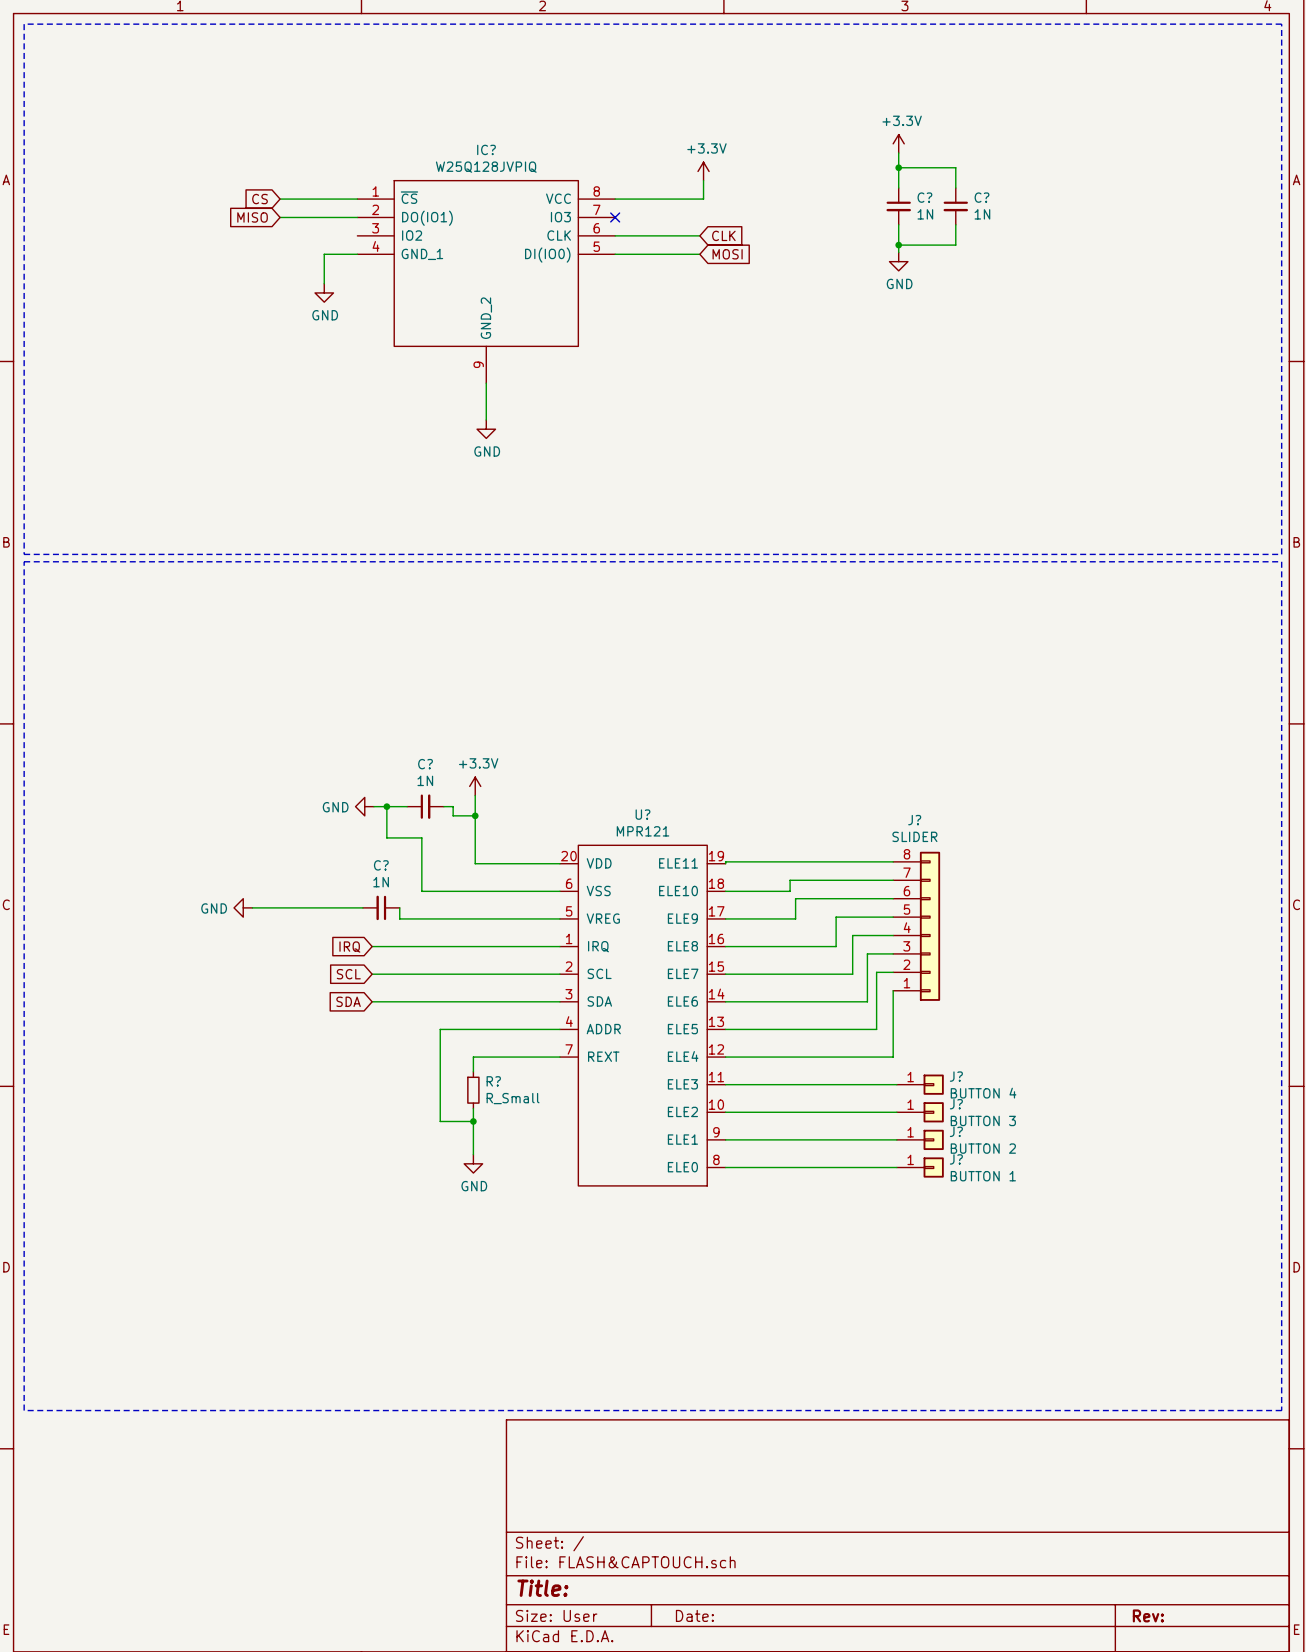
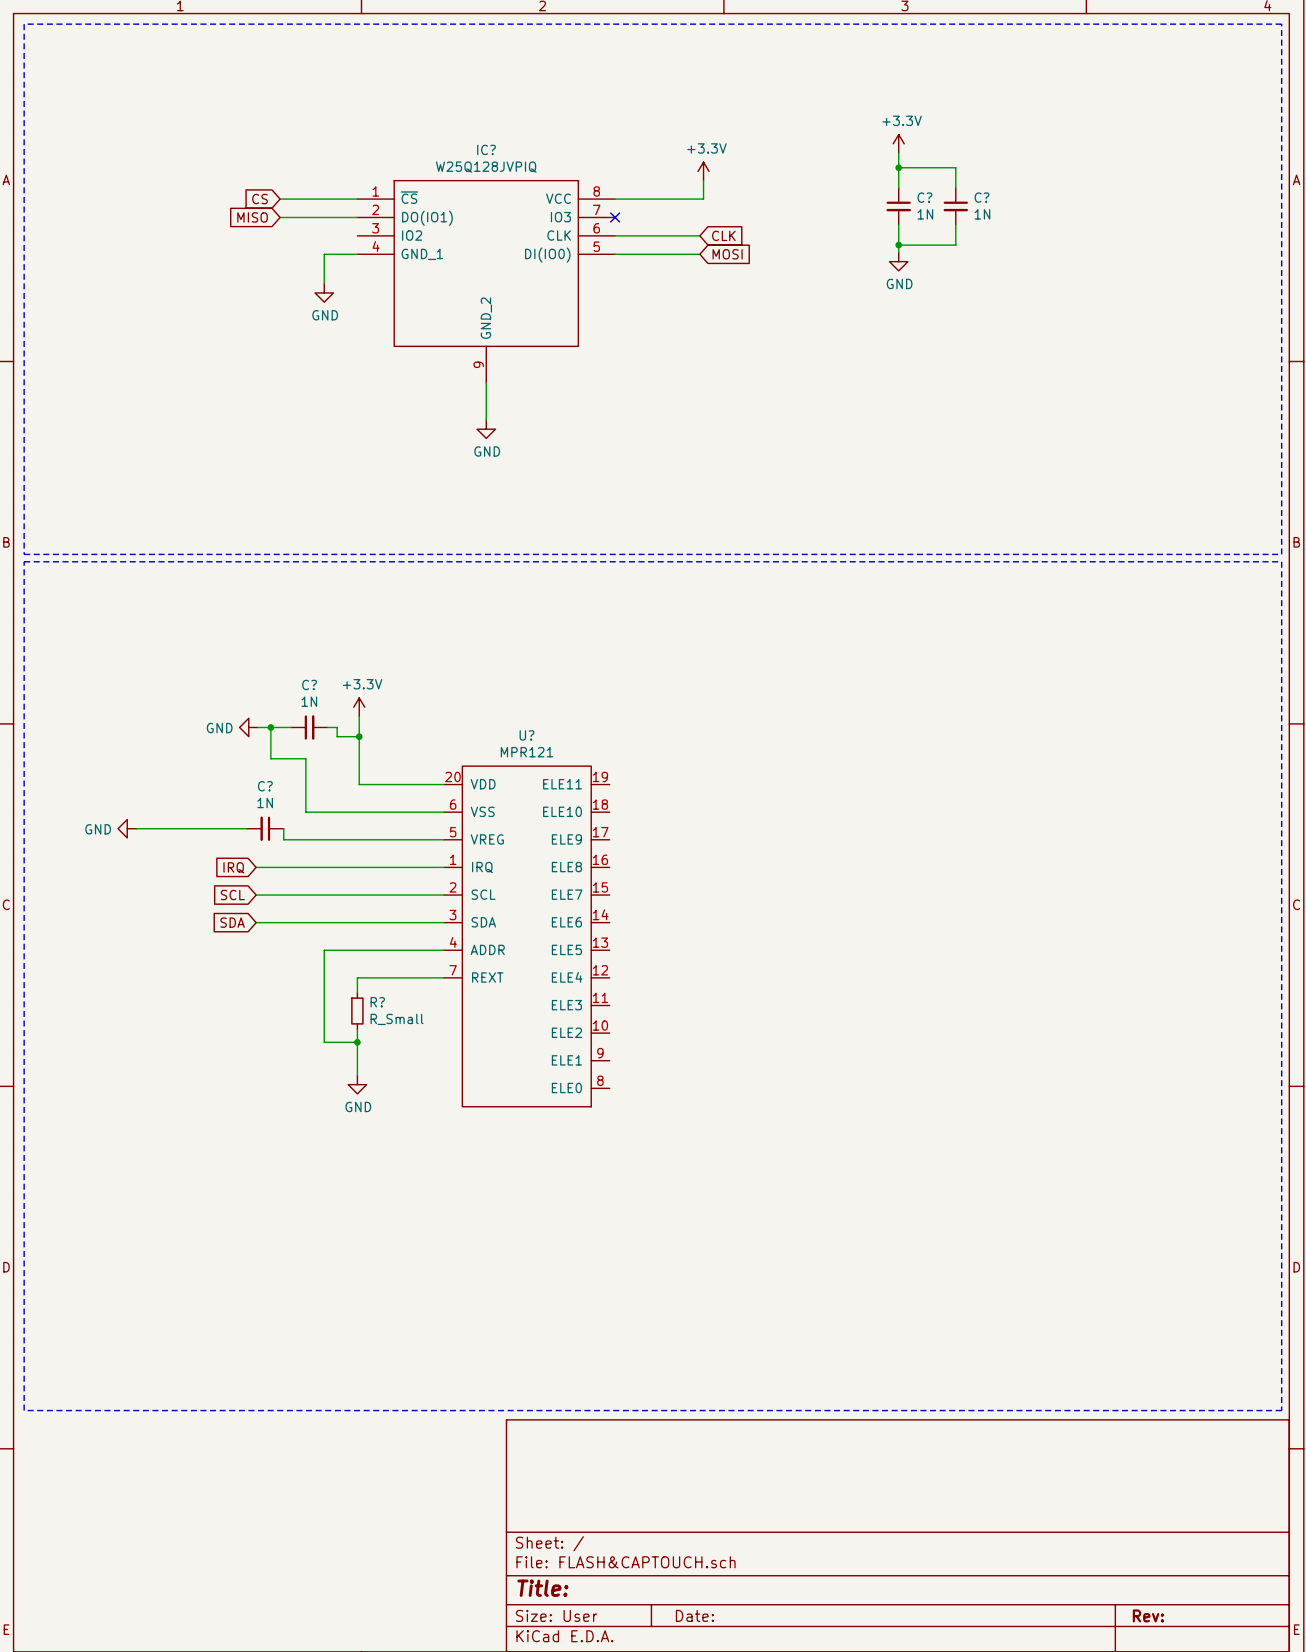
power symbol: none -> GND (248, 727)
junction: none -> (270, 727)
C?: none -> 1N (309, 727)
junction: none -> (359, 736)
power symbol position: +3.3V (475, 786) -> +3.3V (359, 707)
wire: (475, 795) (475, 863) (559, 863) -> (359, 716) (359, 784) (443, 784)
power symbol: GND (364, 806) -> none
wire: (373, 806) (407, 806) -> (257, 727) (291, 727)
wire: (386, 806) (386, 837) (421, 837) (421, 891) (559, 891) -> (270, 727) (270, 758) (305, 758) (305, 812) (443, 812)
junction: (386, 806) -> none
C?: 1N (425, 806) -> none
wire: (443, 806) (453, 806) (453, 815) (475, 815) -> (327, 727) (337, 727) (337, 736) (359, 736)
junction: (475, 815) -> none
power symbol: none -> GND (127, 828)
C?: none -> 1N (265, 828)
wire: (893, 861) (725, 861) (725, 863) -> none
wire: (893, 880) (790, 880) (790, 891) (725, 891) -> none
wire: (893, 898) (795, 898) (795, 918) (725, 918) -> none
power symbol: GND (243, 907) -> none
wire: (252, 907) (362, 907) -> (136, 828) (246, 828)
C?: 1N (381, 907) -> none
wire: (399, 907) (399, 918) (559, 918) -> (283, 828) (283, 839) (443, 839)
wire: (893, 917) (836, 917) (836, 946) (725, 946) -> none
J?: SLIDER (916, 926) -> none
wire: (893, 935) (852, 935) (852, 974) (725, 974) -> none
wire: (372, 946) (559, 946) -> (256, 867) (443, 867)
global label position: IRQ (349, 947) -> IRQ (233, 867)
wire: (893, 953) (867, 953) (867, 1001) (725, 1001) -> none
wire: (893, 972) (876, 972) (876, 1029) (725, 1029) -> none
global label position: SCL (348, 974) -> SCL (232, 895)
wire: (372, 974) (559, 974) -> (256, 895) (443, 895)
wire: (893, 990) (893, 1057) (725, 1057) -> none
global label position: SDA (348, 1001) -> SDA (232, 922)
wire: (372, 1001) (559, 1001) -> (256, 922) (443, 922)
U? position: (642, 1015) -> (526, 936)
wire: (559, 1029) (440, 1029) (440, 1121) (473, 1121) -> (443, 950) (324, 950) (324, 1042) (357, 1042)
junction: none -> (357, 1042)
wire: (559, 1057) (473, 1057) (473, 1071) -> (443, 977) (357, 977) (357, 992)
power symbol: none -> GND (357, 1084)
wire: (725, 1084) (896, 1084) -> none
J?: BUTTON 4 (920, 1084) -> none
R? position: (473, 1090) -> (357, 1011)
wire: (473, 1108) (473, 1154) -> (357, 1029) (357, 1075)
wire: (725, 1112) (896, 1112) -> none
J?: BUTTON 3 (920, 1112) -> none
junction: (473, 1121) -> none
wire: (725, 1139) (896, 1139) -> none
J?: BUTTON 2 (920, 1139) -> none
power symbol: GND (473, 1163) -> none
wire: (725, 1167) (896, 1167) -> none
J?: BUTTON 1 (920, 1167) -> none

